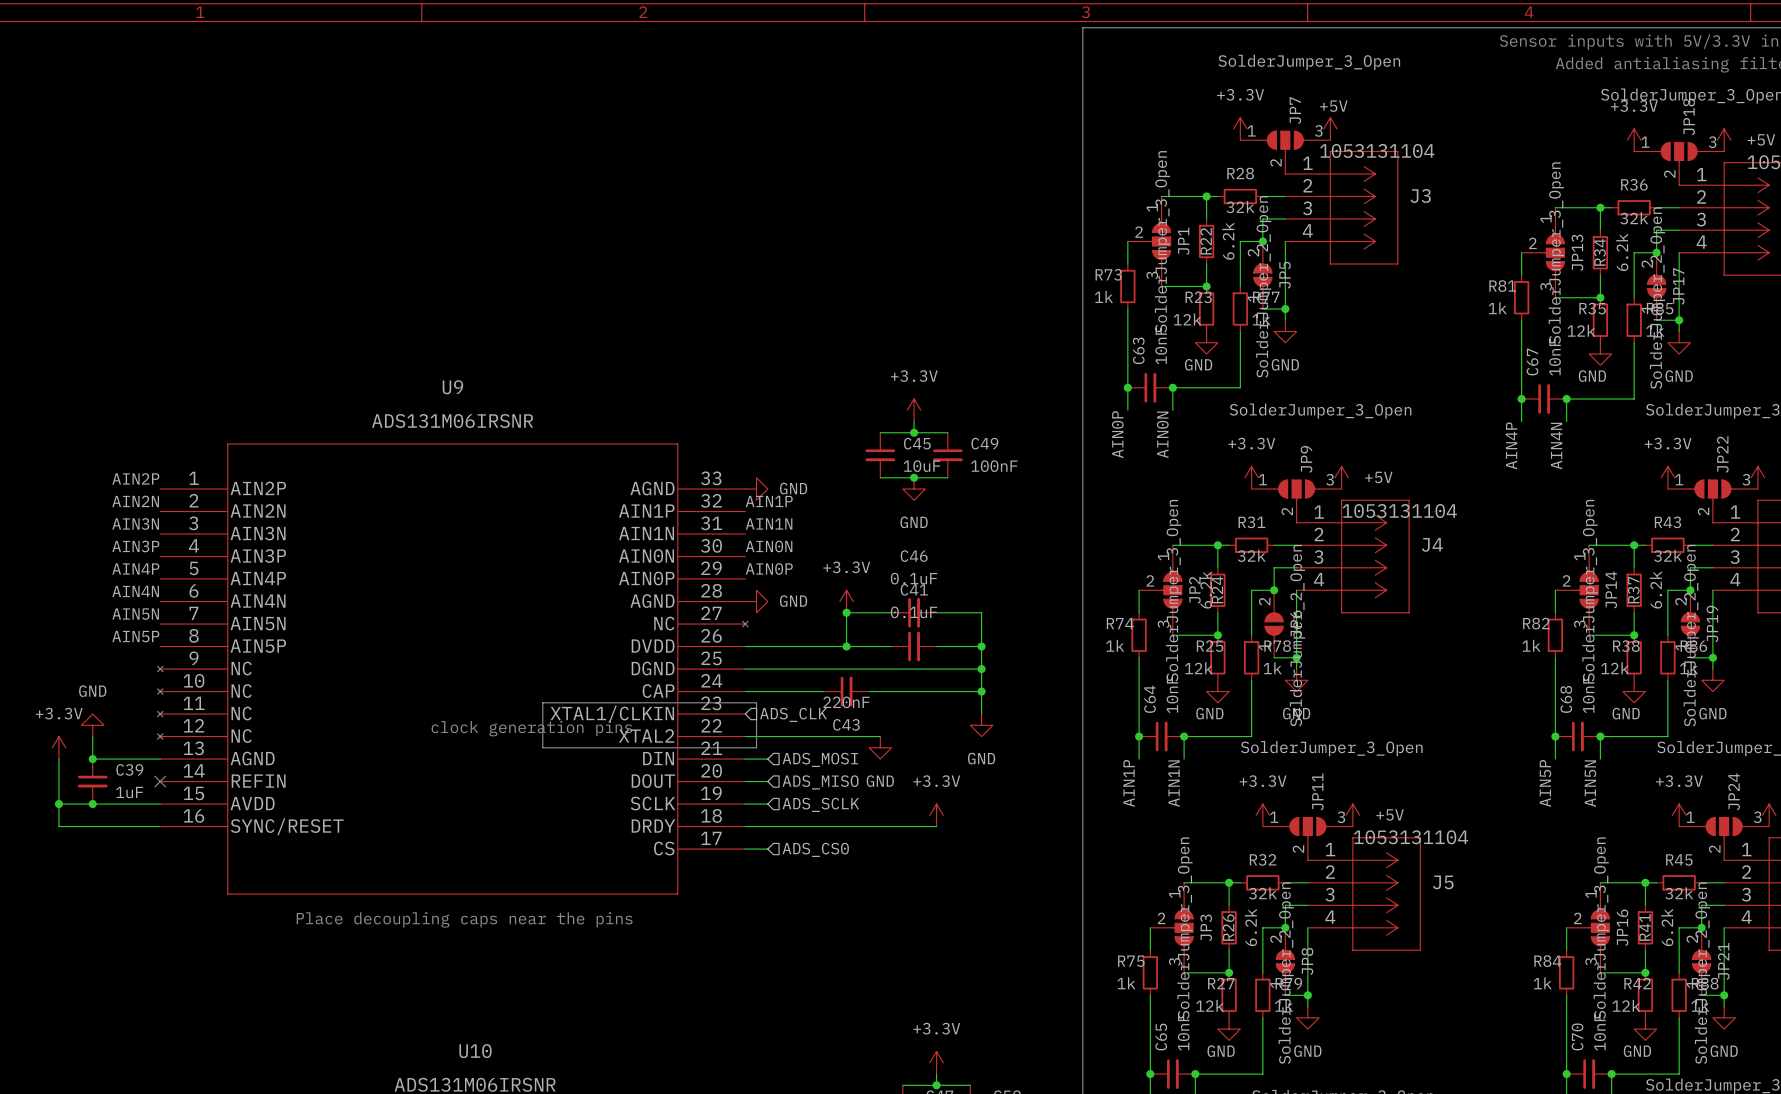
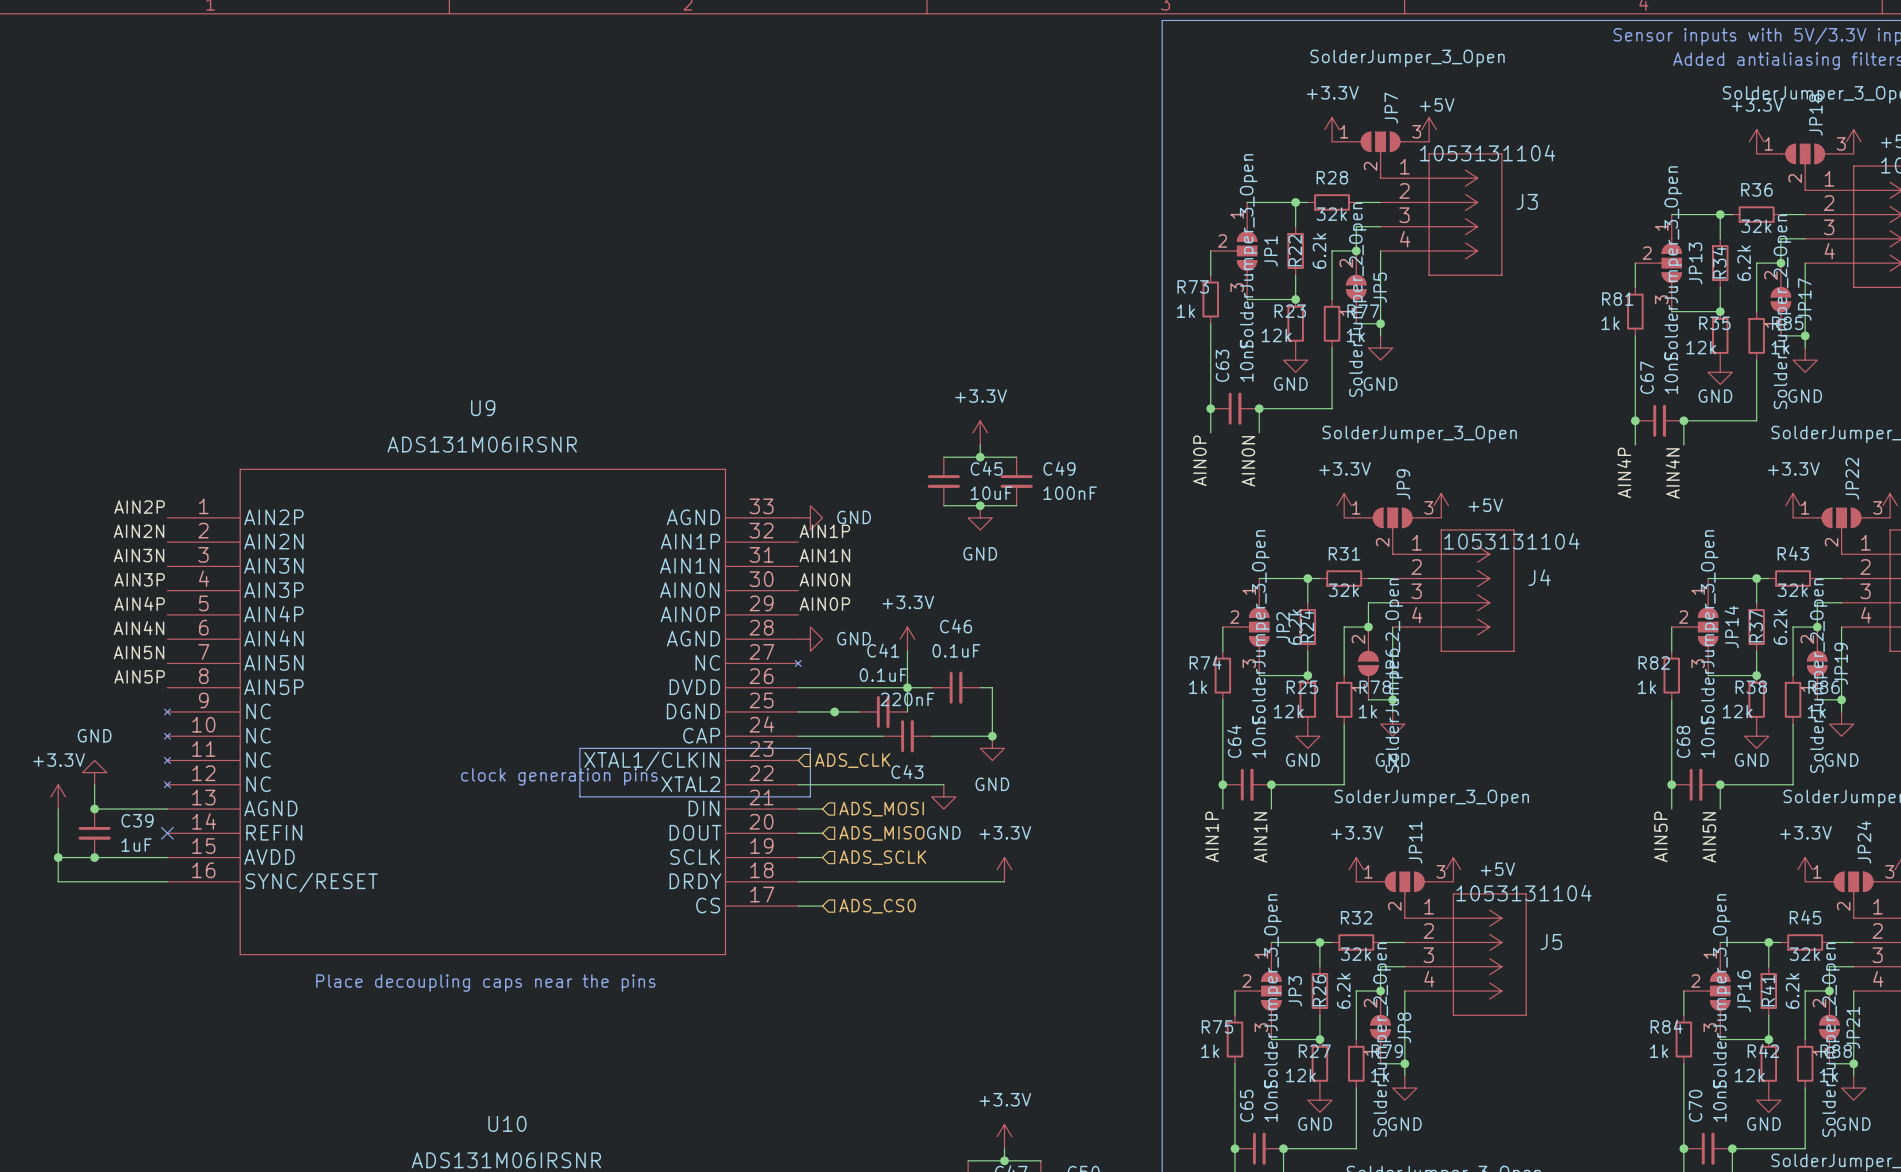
wire: (846, 612) (891, 612) -> none
junction: (846, 612) -> none
C46 position: (914, 612) -> (955, 687)
wire: (936, 612) (981, 612) (981, 714) -> none
wire: none -> (907, 687) (907, 711)
C41 position: (914, 646) -> (883, 711)
wire: (936, 646) (981, 646) -> none
junction: (981, 646) -> none
junction: none -> (834, 711)
wire: (801, 669) (981, 669) -> none
junction: (981, 669) -> none
wire: (925, 691) (981, 691) -> (992, 736) (992, 687) (980, 687)
junction: none -> (992, 736)
junction: (981, 691) -> none
C43 value position: 220nF (846, 702) -> 220nF (907, 699)
power symbol position: GND (981, 725) -> GND (992, 748)

